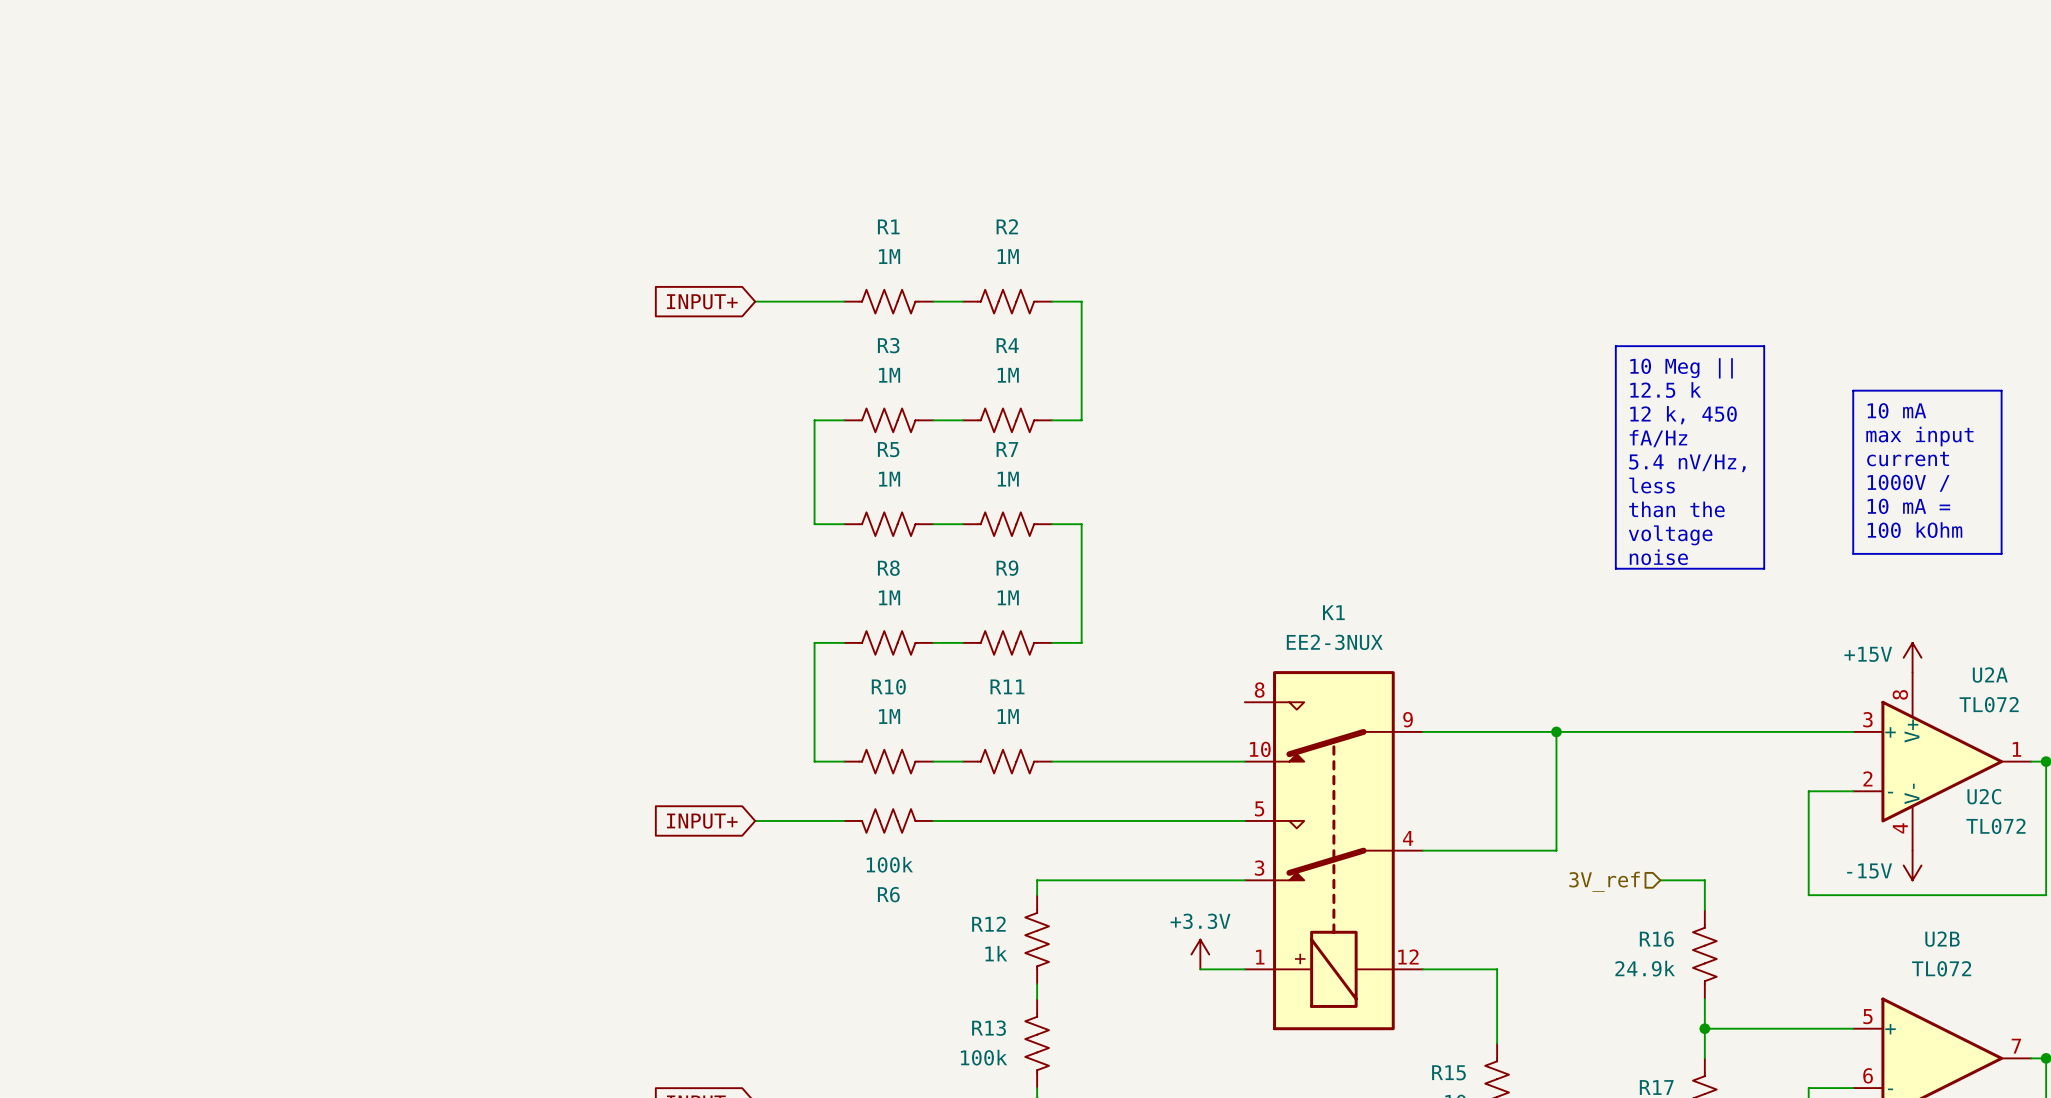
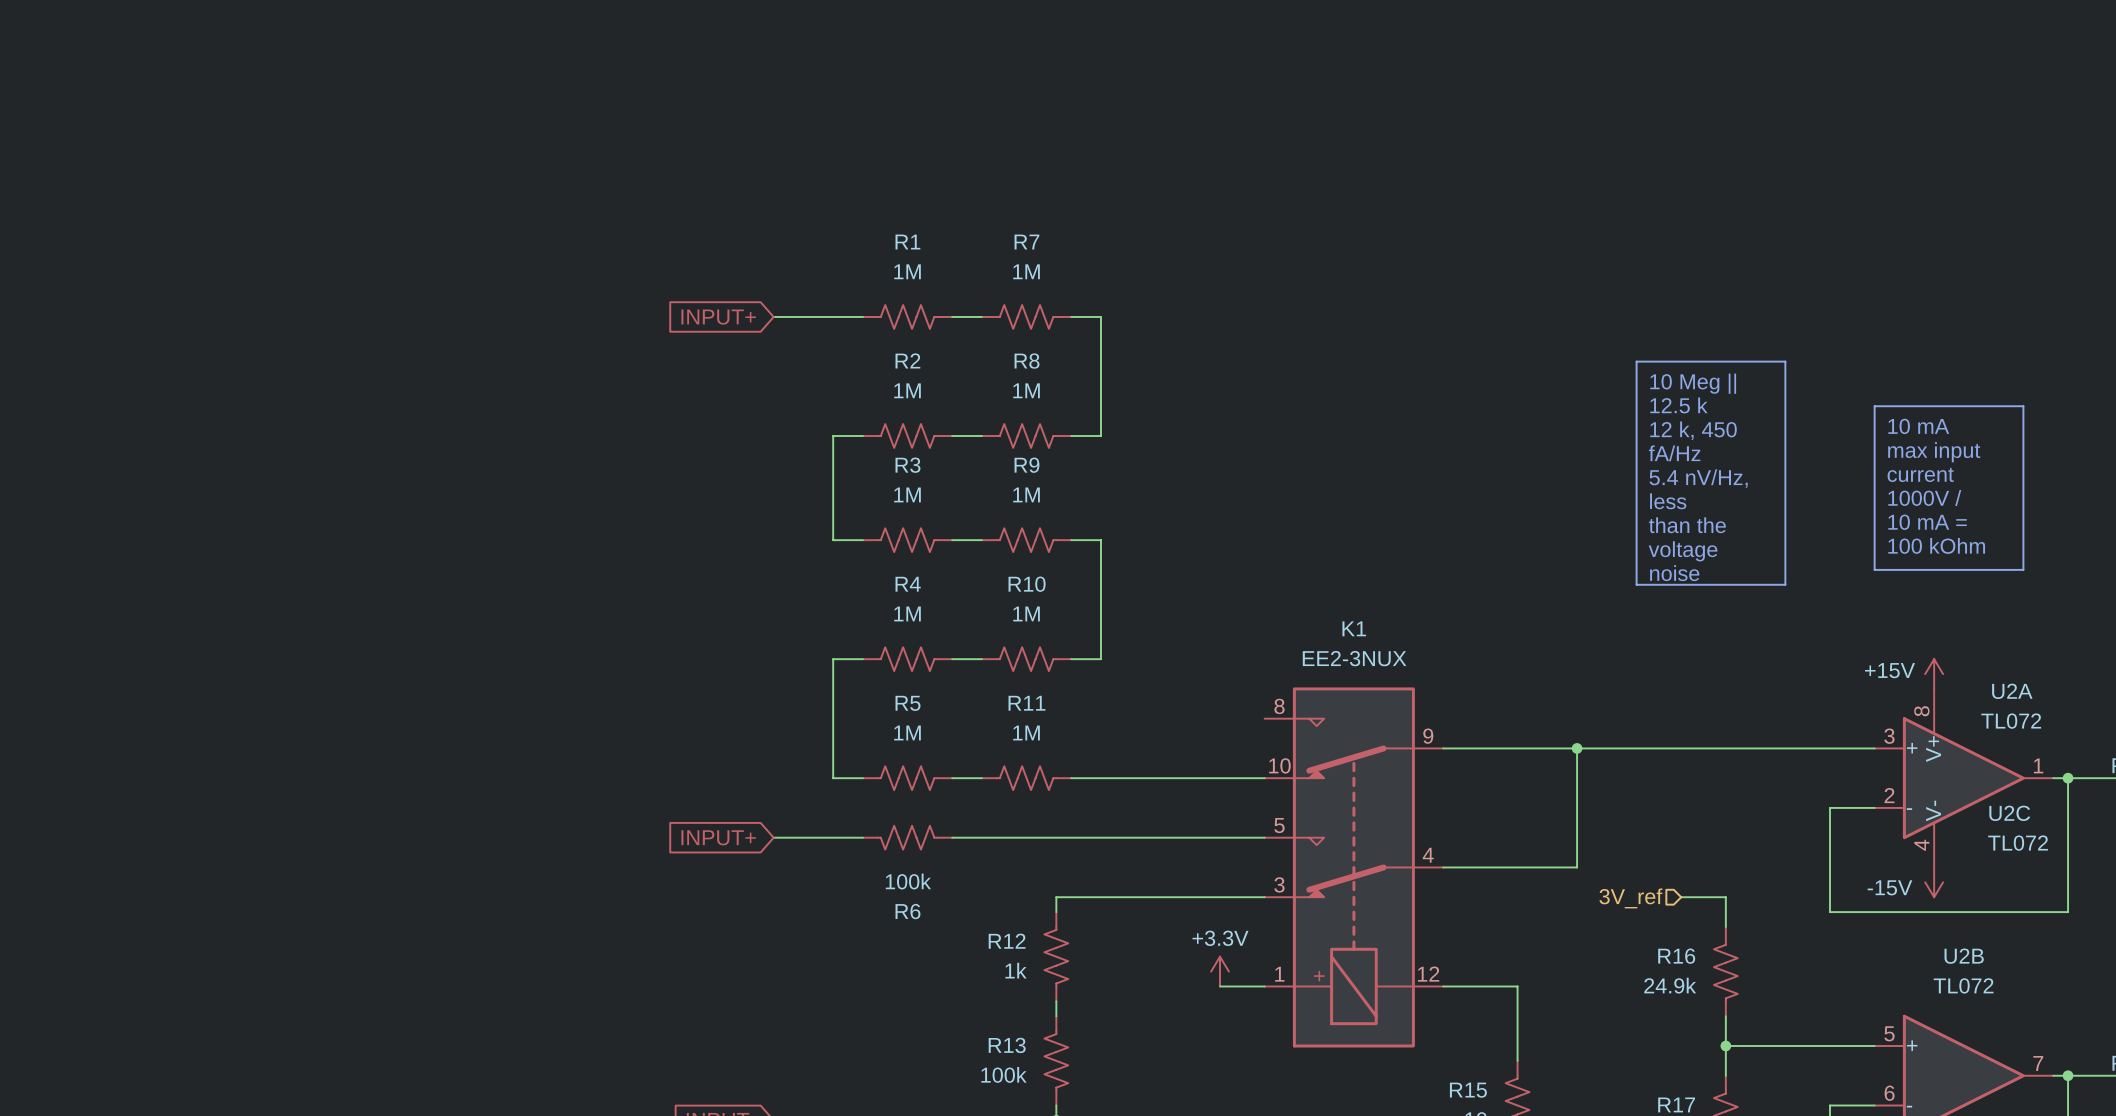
R2 name: R2 (1007, 226) -> R7 (1026, 242)
R3 name: R3 (888, 345) -> R2 (907, 360)
R4 name: R4 (1007, 345) -> R8 (1027, 361)
R5 name: R5 (888, 449) -> R3 (907, 465)
R7 name: R7 (1007, 449) -> R9 (1026, 465)
R8 name: R8 (888, 568) -> R4 (908, 584)
R9 name: R9 (1007, 568) -> R10 (1027, 584)
R10 name: R10 (888, 686) -> R5 (908, 703)

